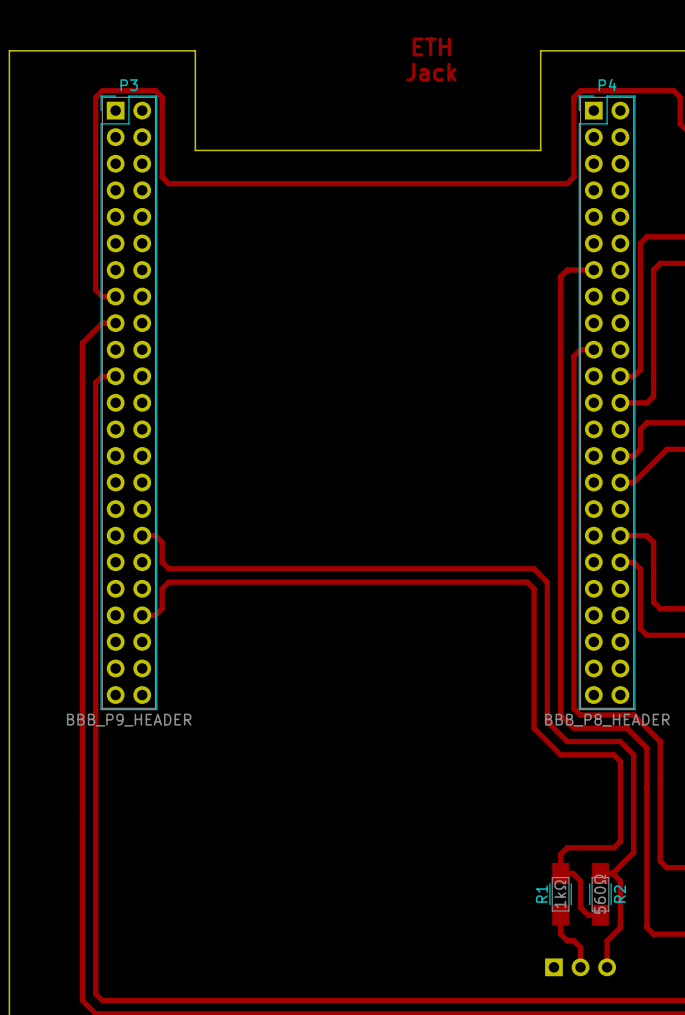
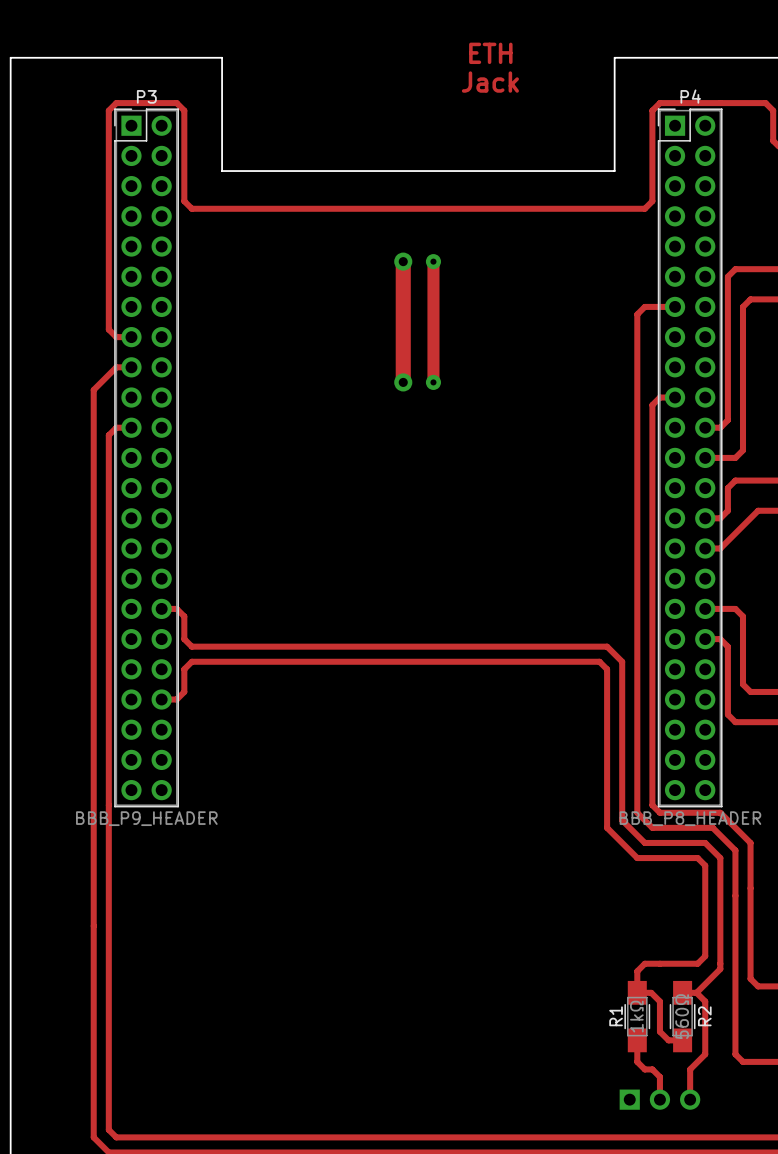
track: none -> (403, 261) (403, 382)
via: none -> (403, 261)
track: none -> (433, 261) (433, 382)
via: none -> (433, 261)
via: none -> (403, 382)
via: none -> (433, 382)

